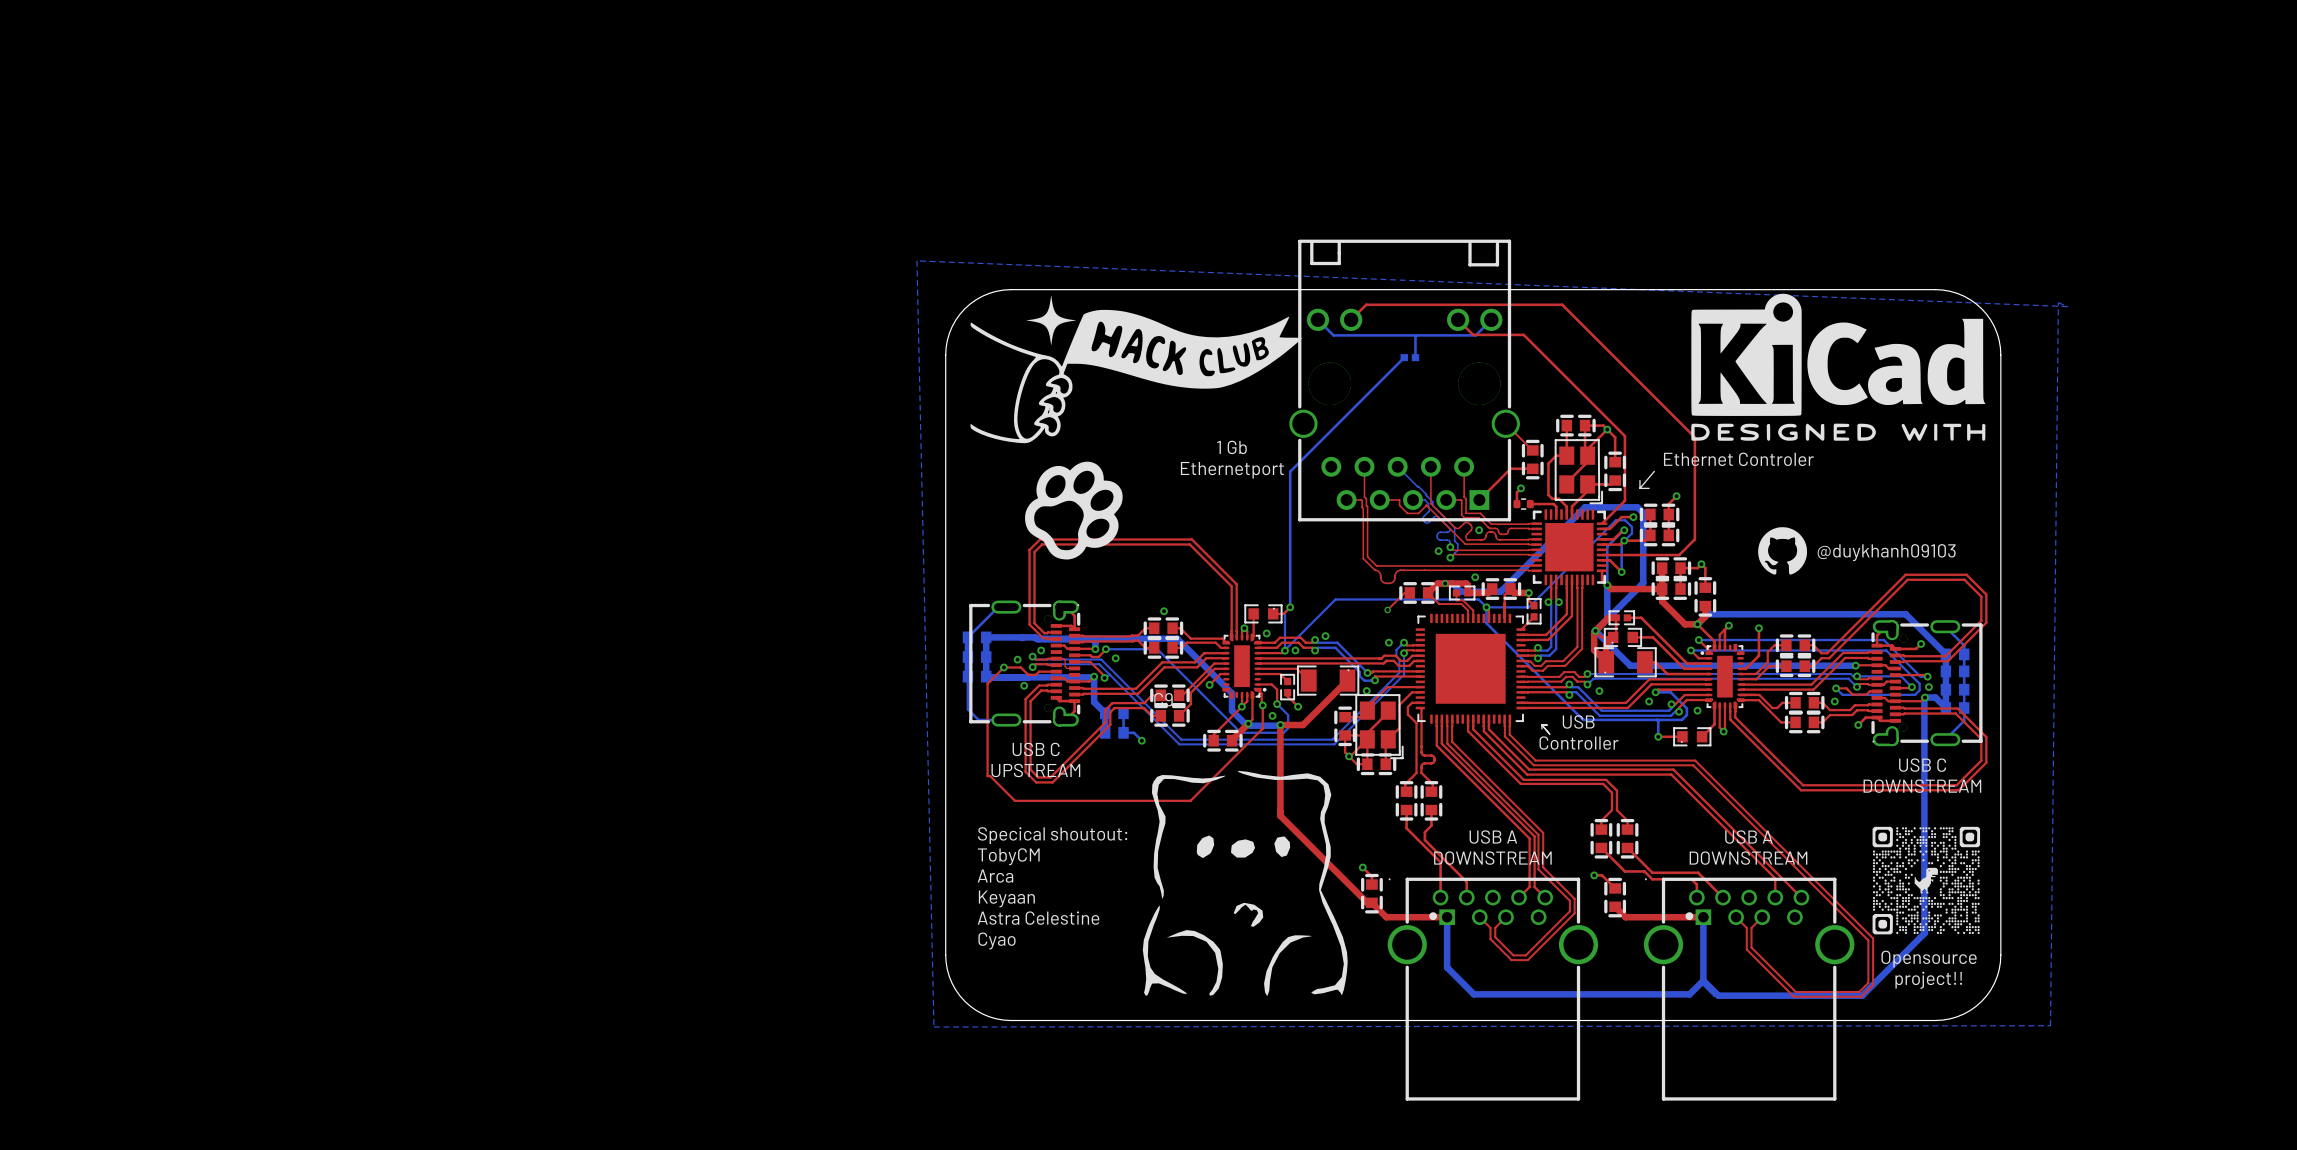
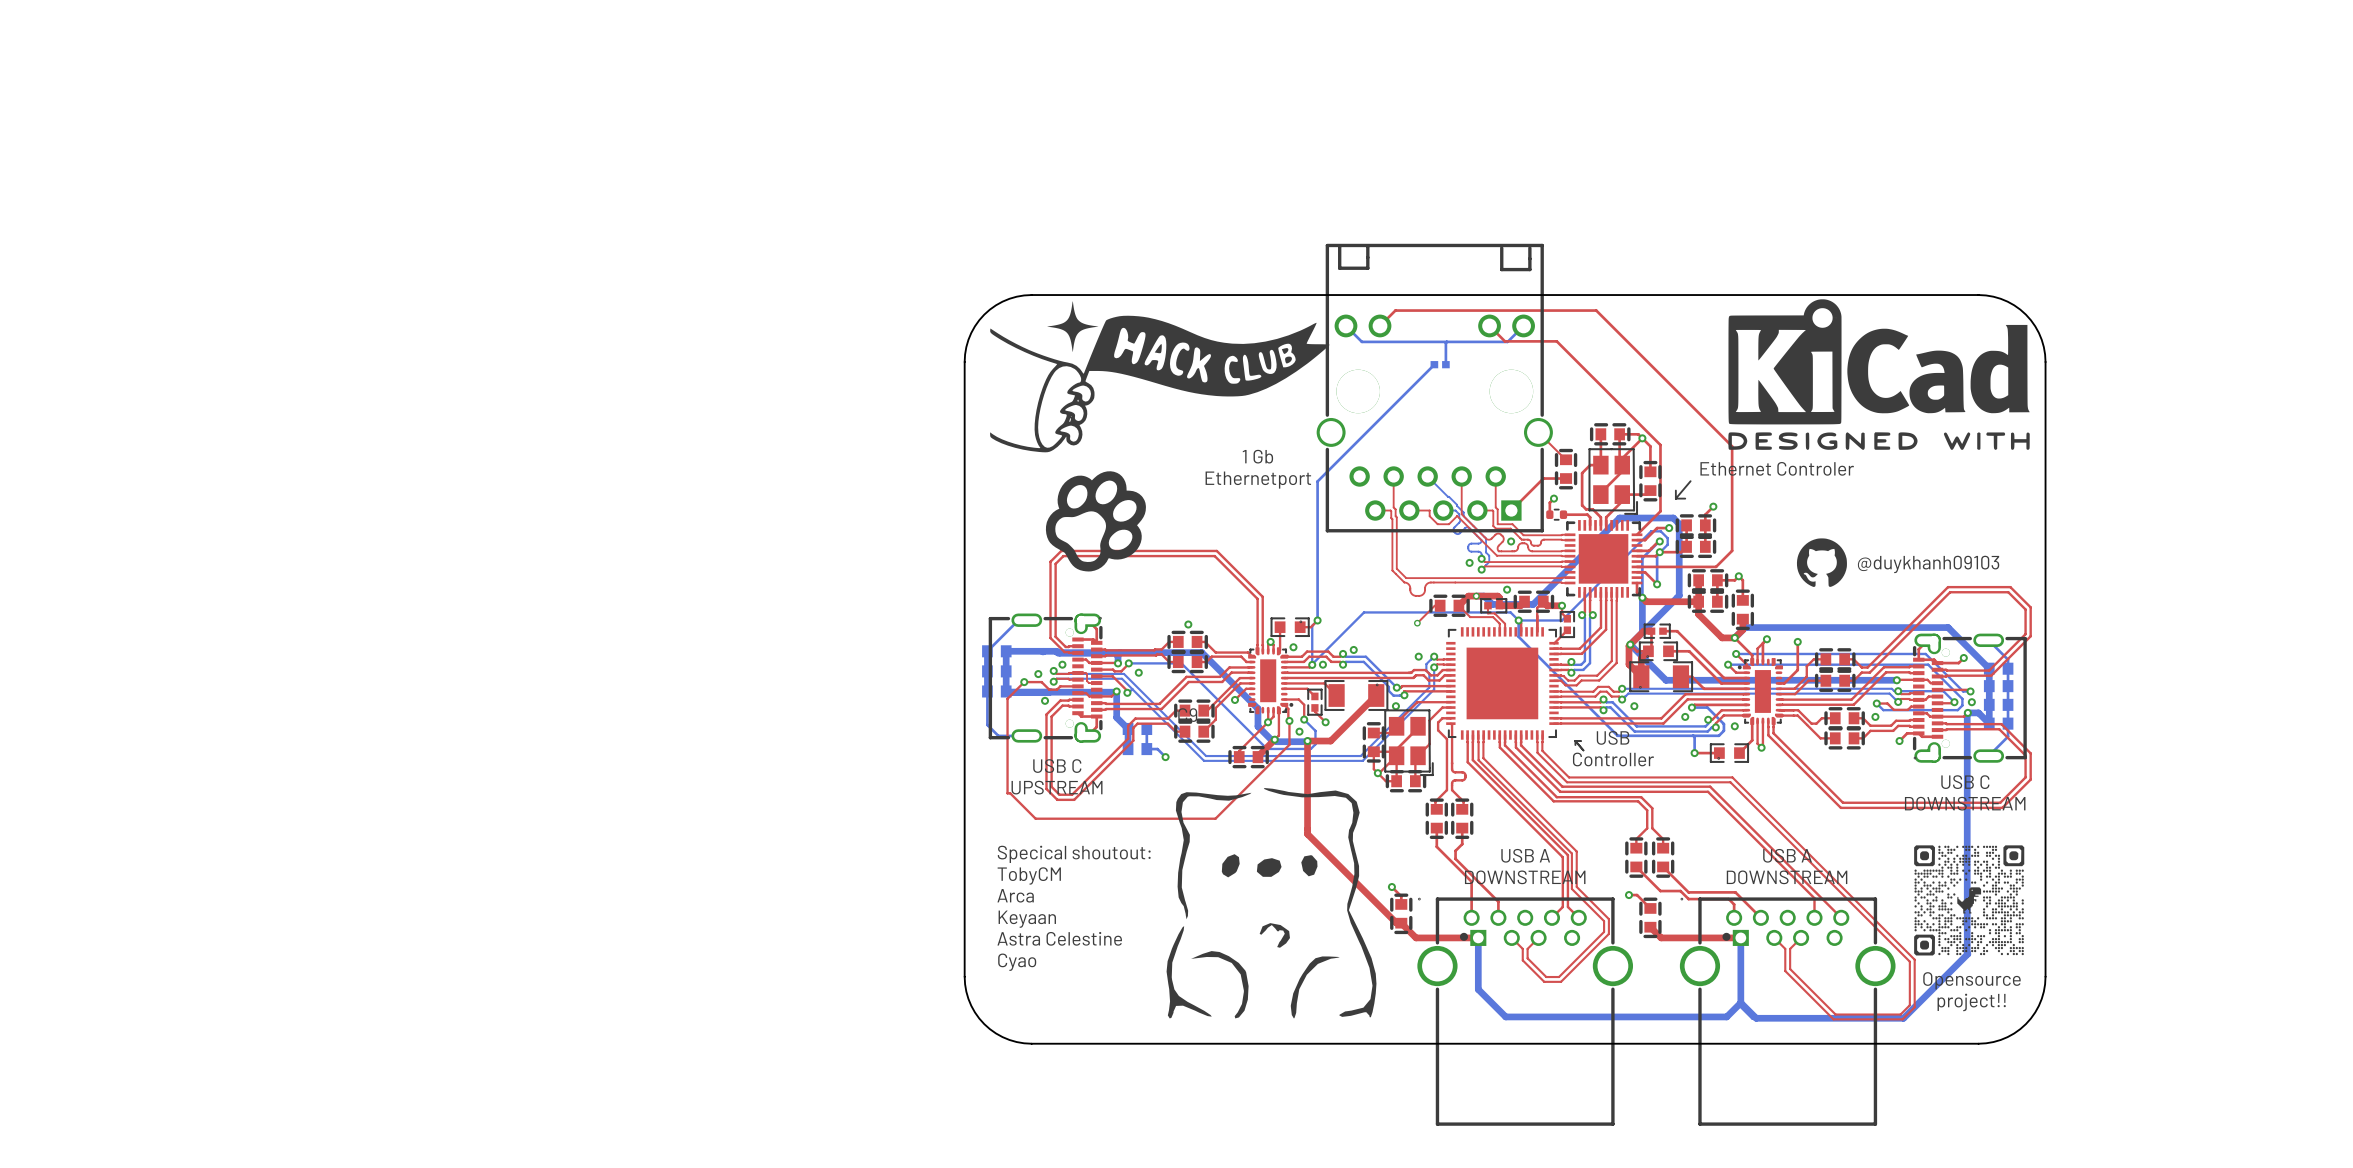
bottom zone outline: (916, 260) (2067, 306) (2058, 302) (2050, 1025) (933, 1027) (916, 260) -> none

